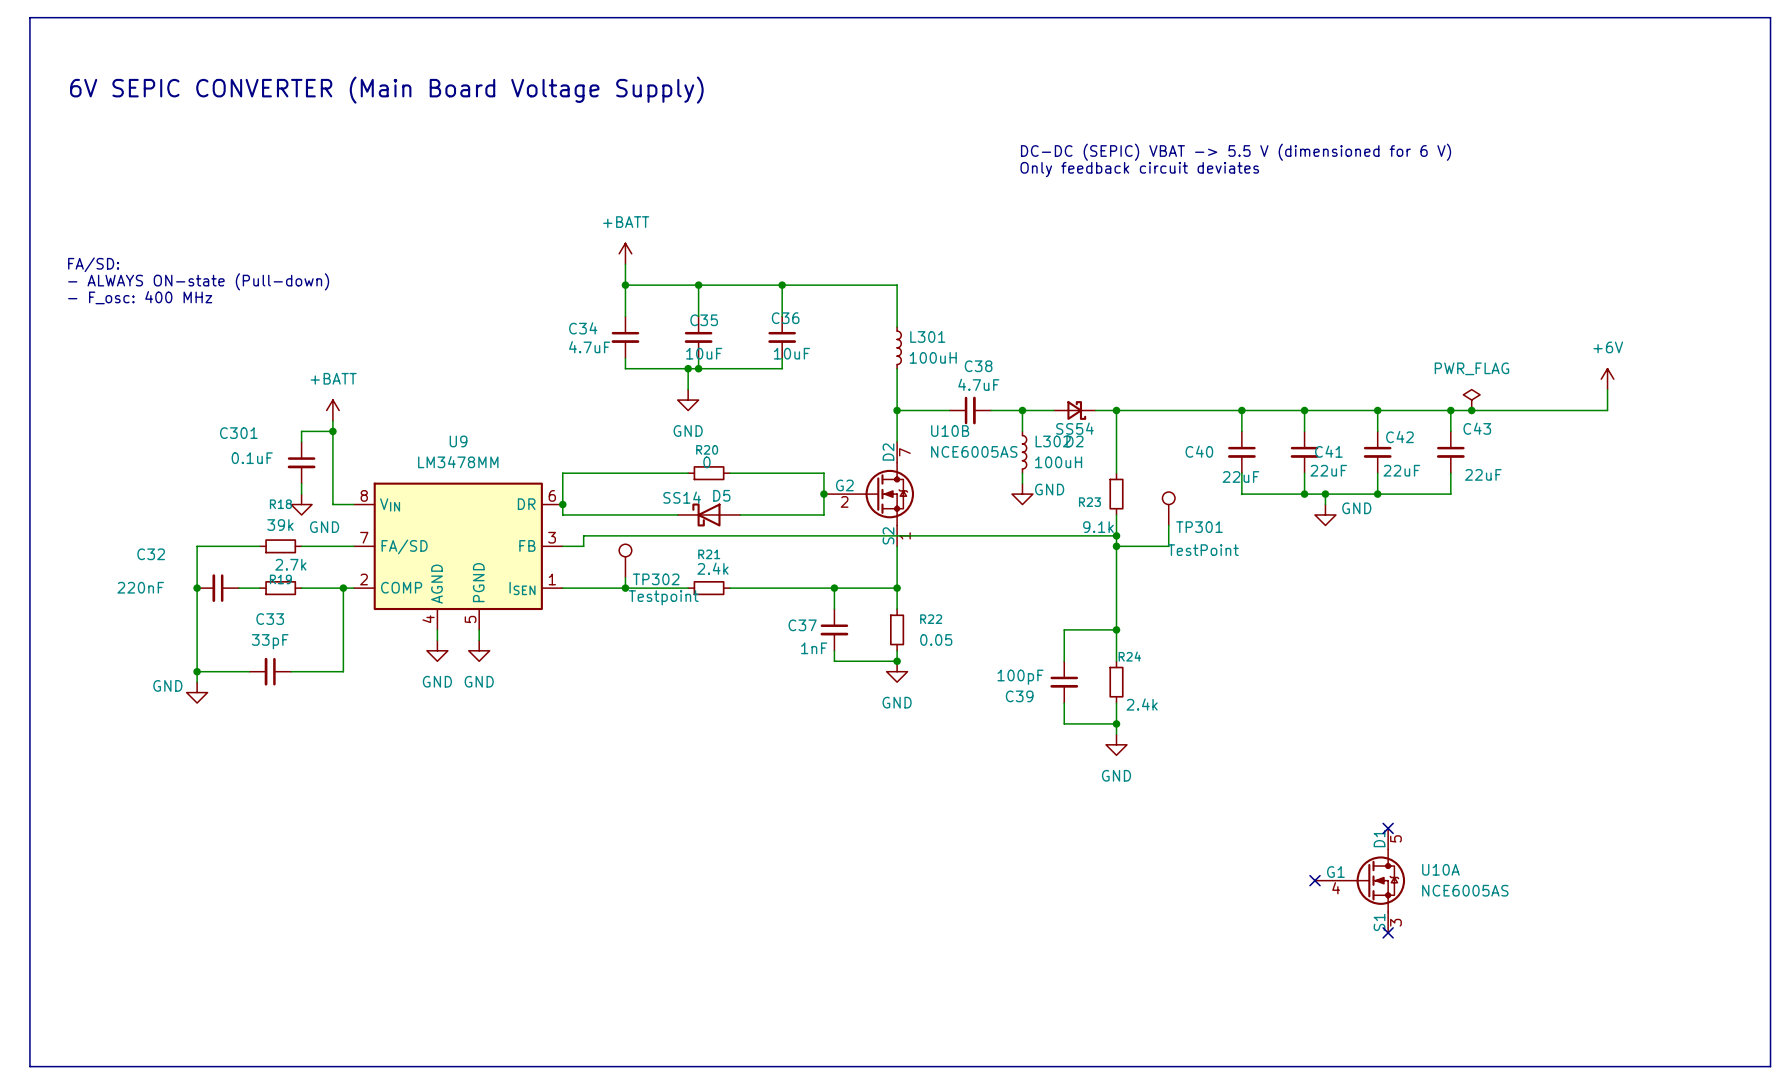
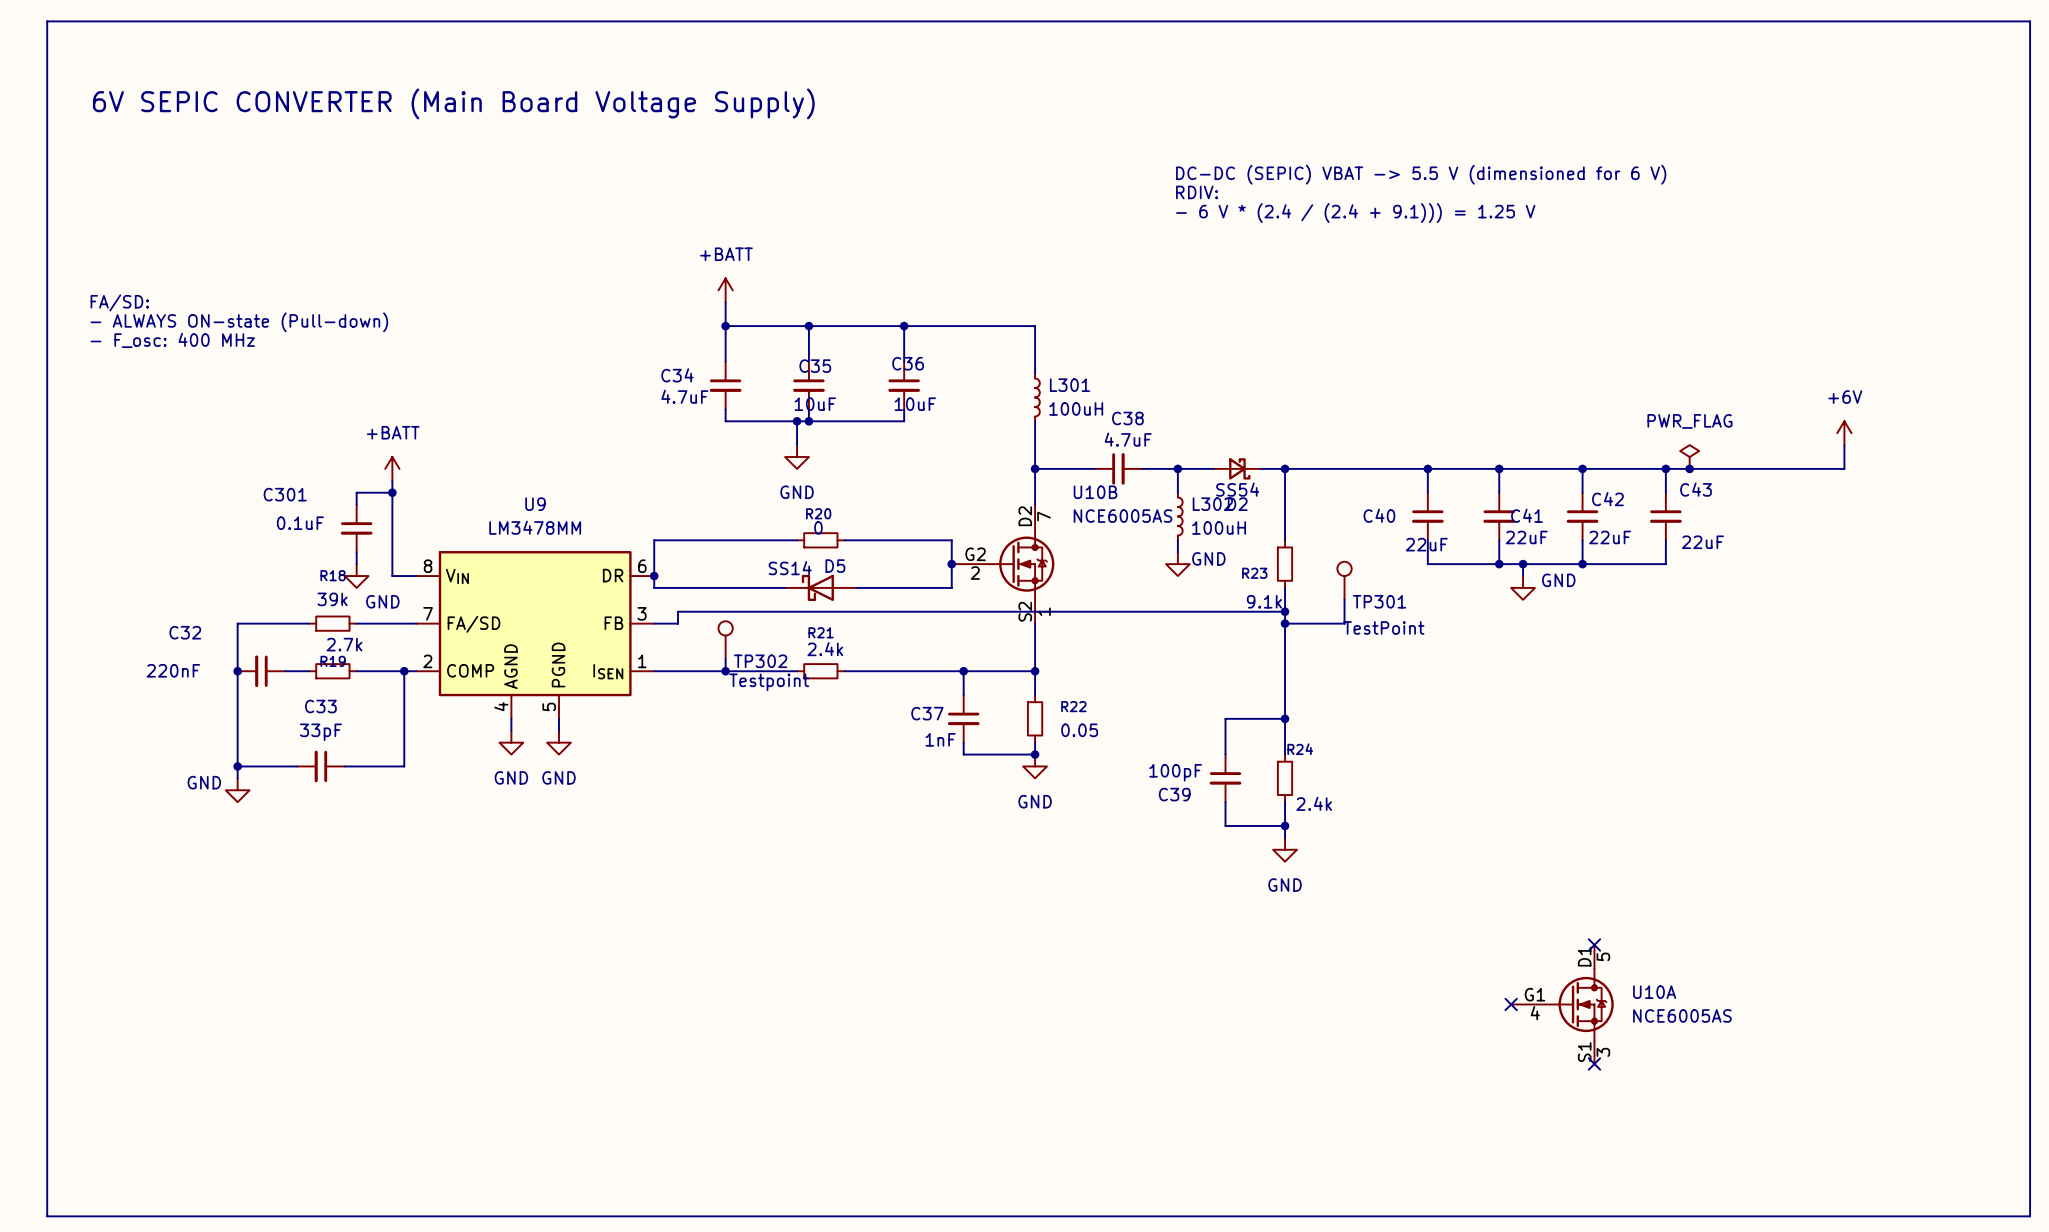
text: Only feedback circuit deviates (1139, 169) -> RDIV: (1197, 192)
text: none -> - 6 V * (2.4 / (2.4 + 9.1))) = 1.25 V (1355, 213)

